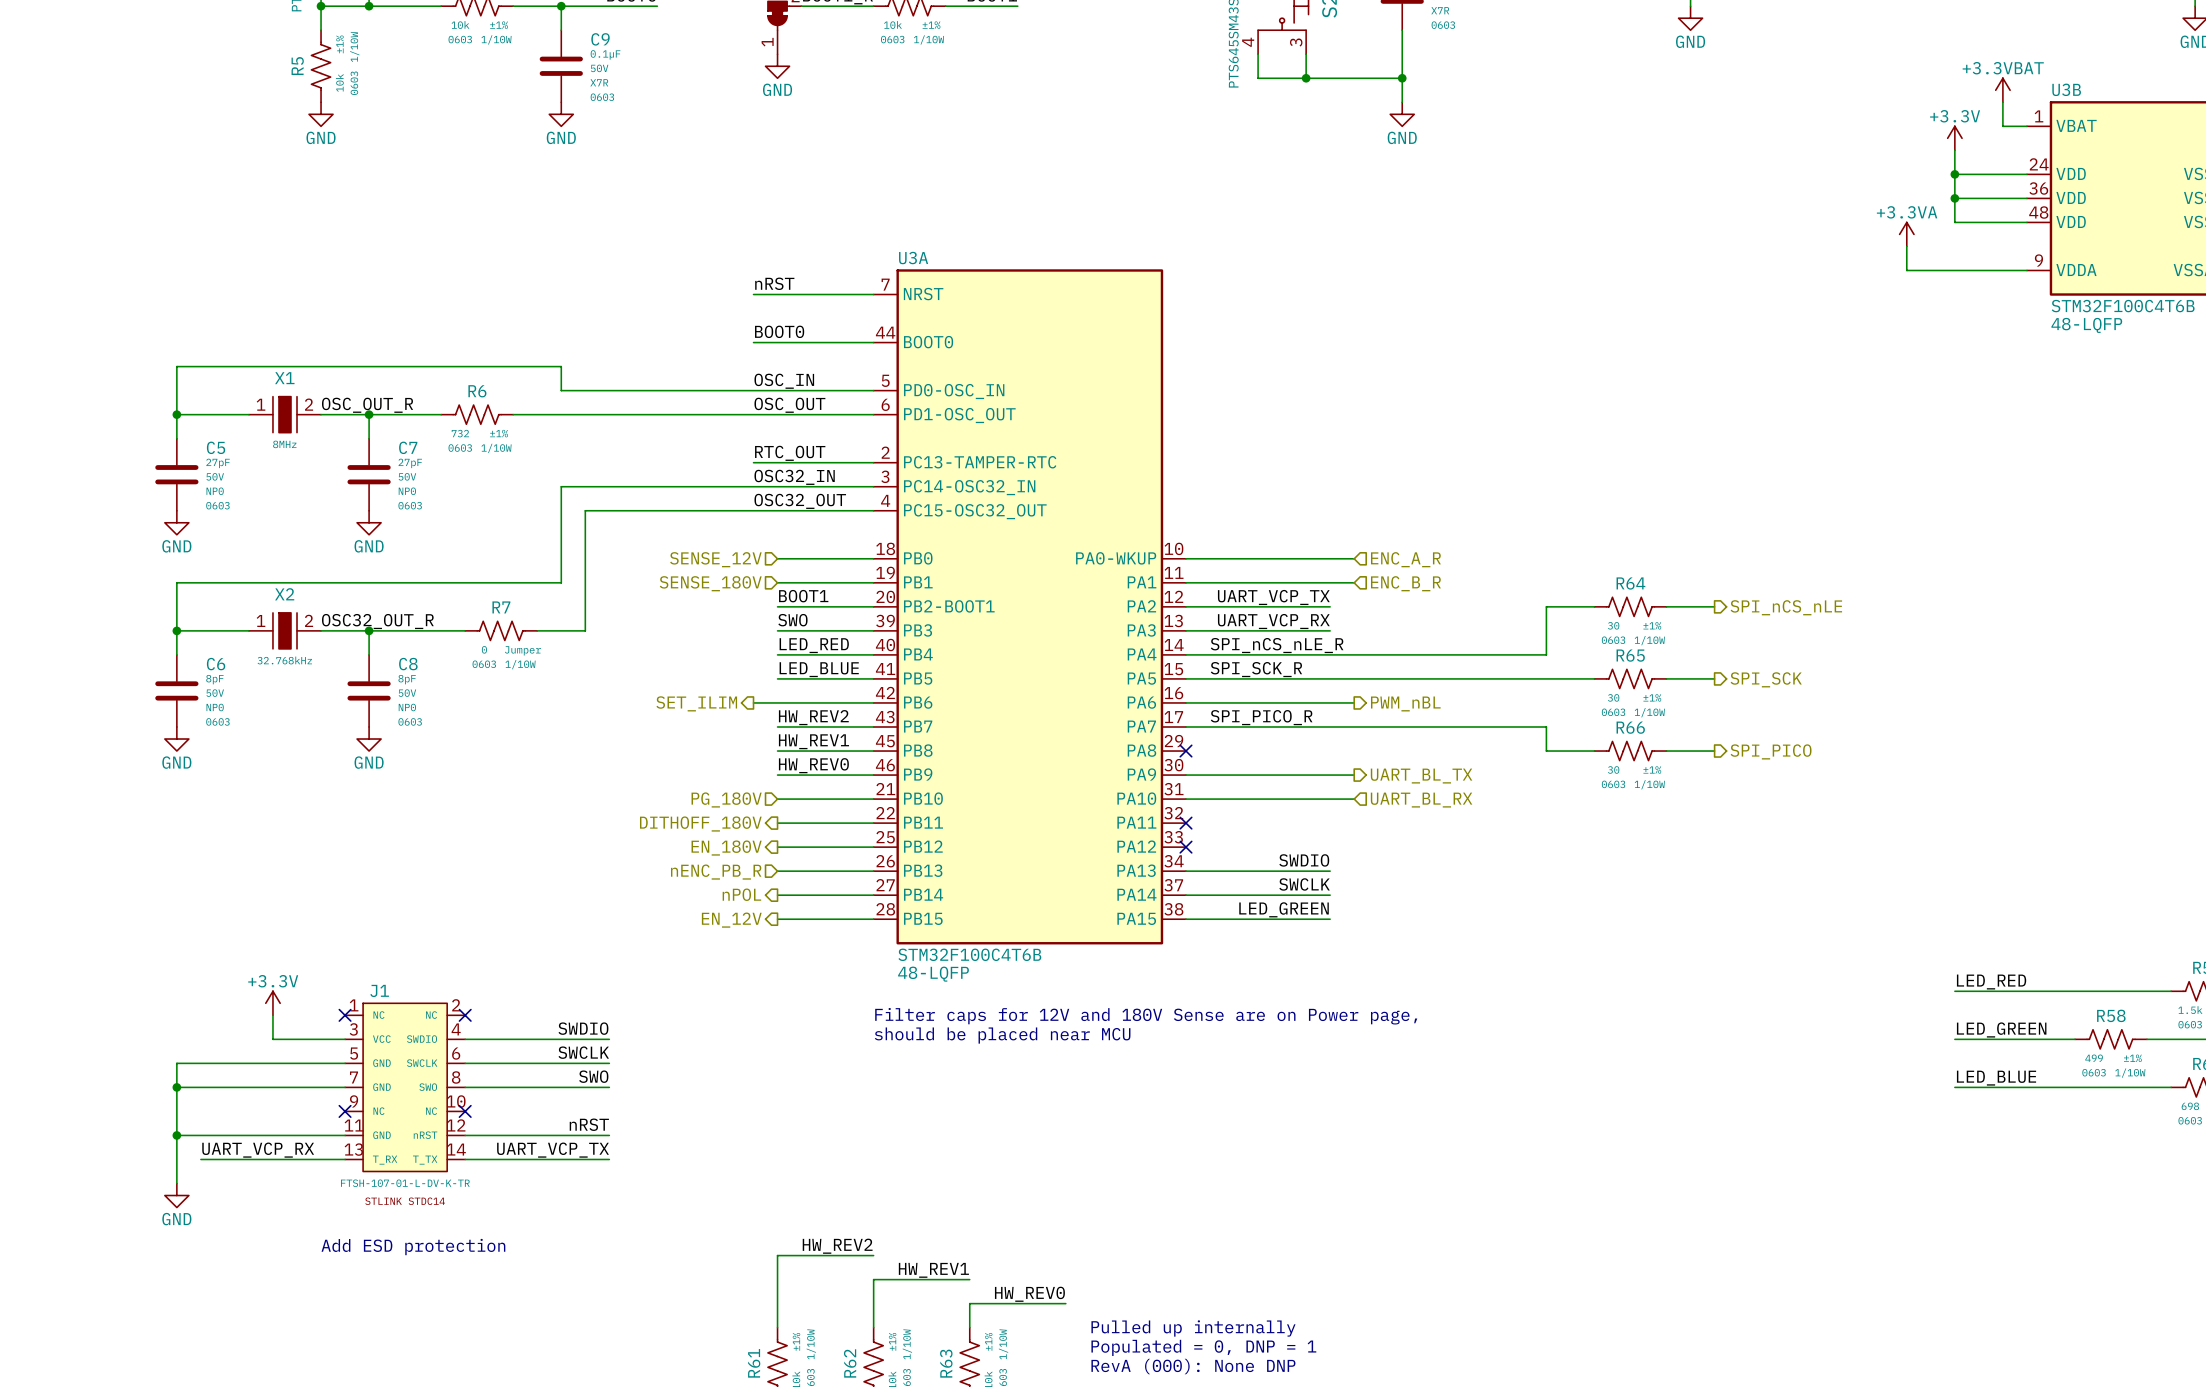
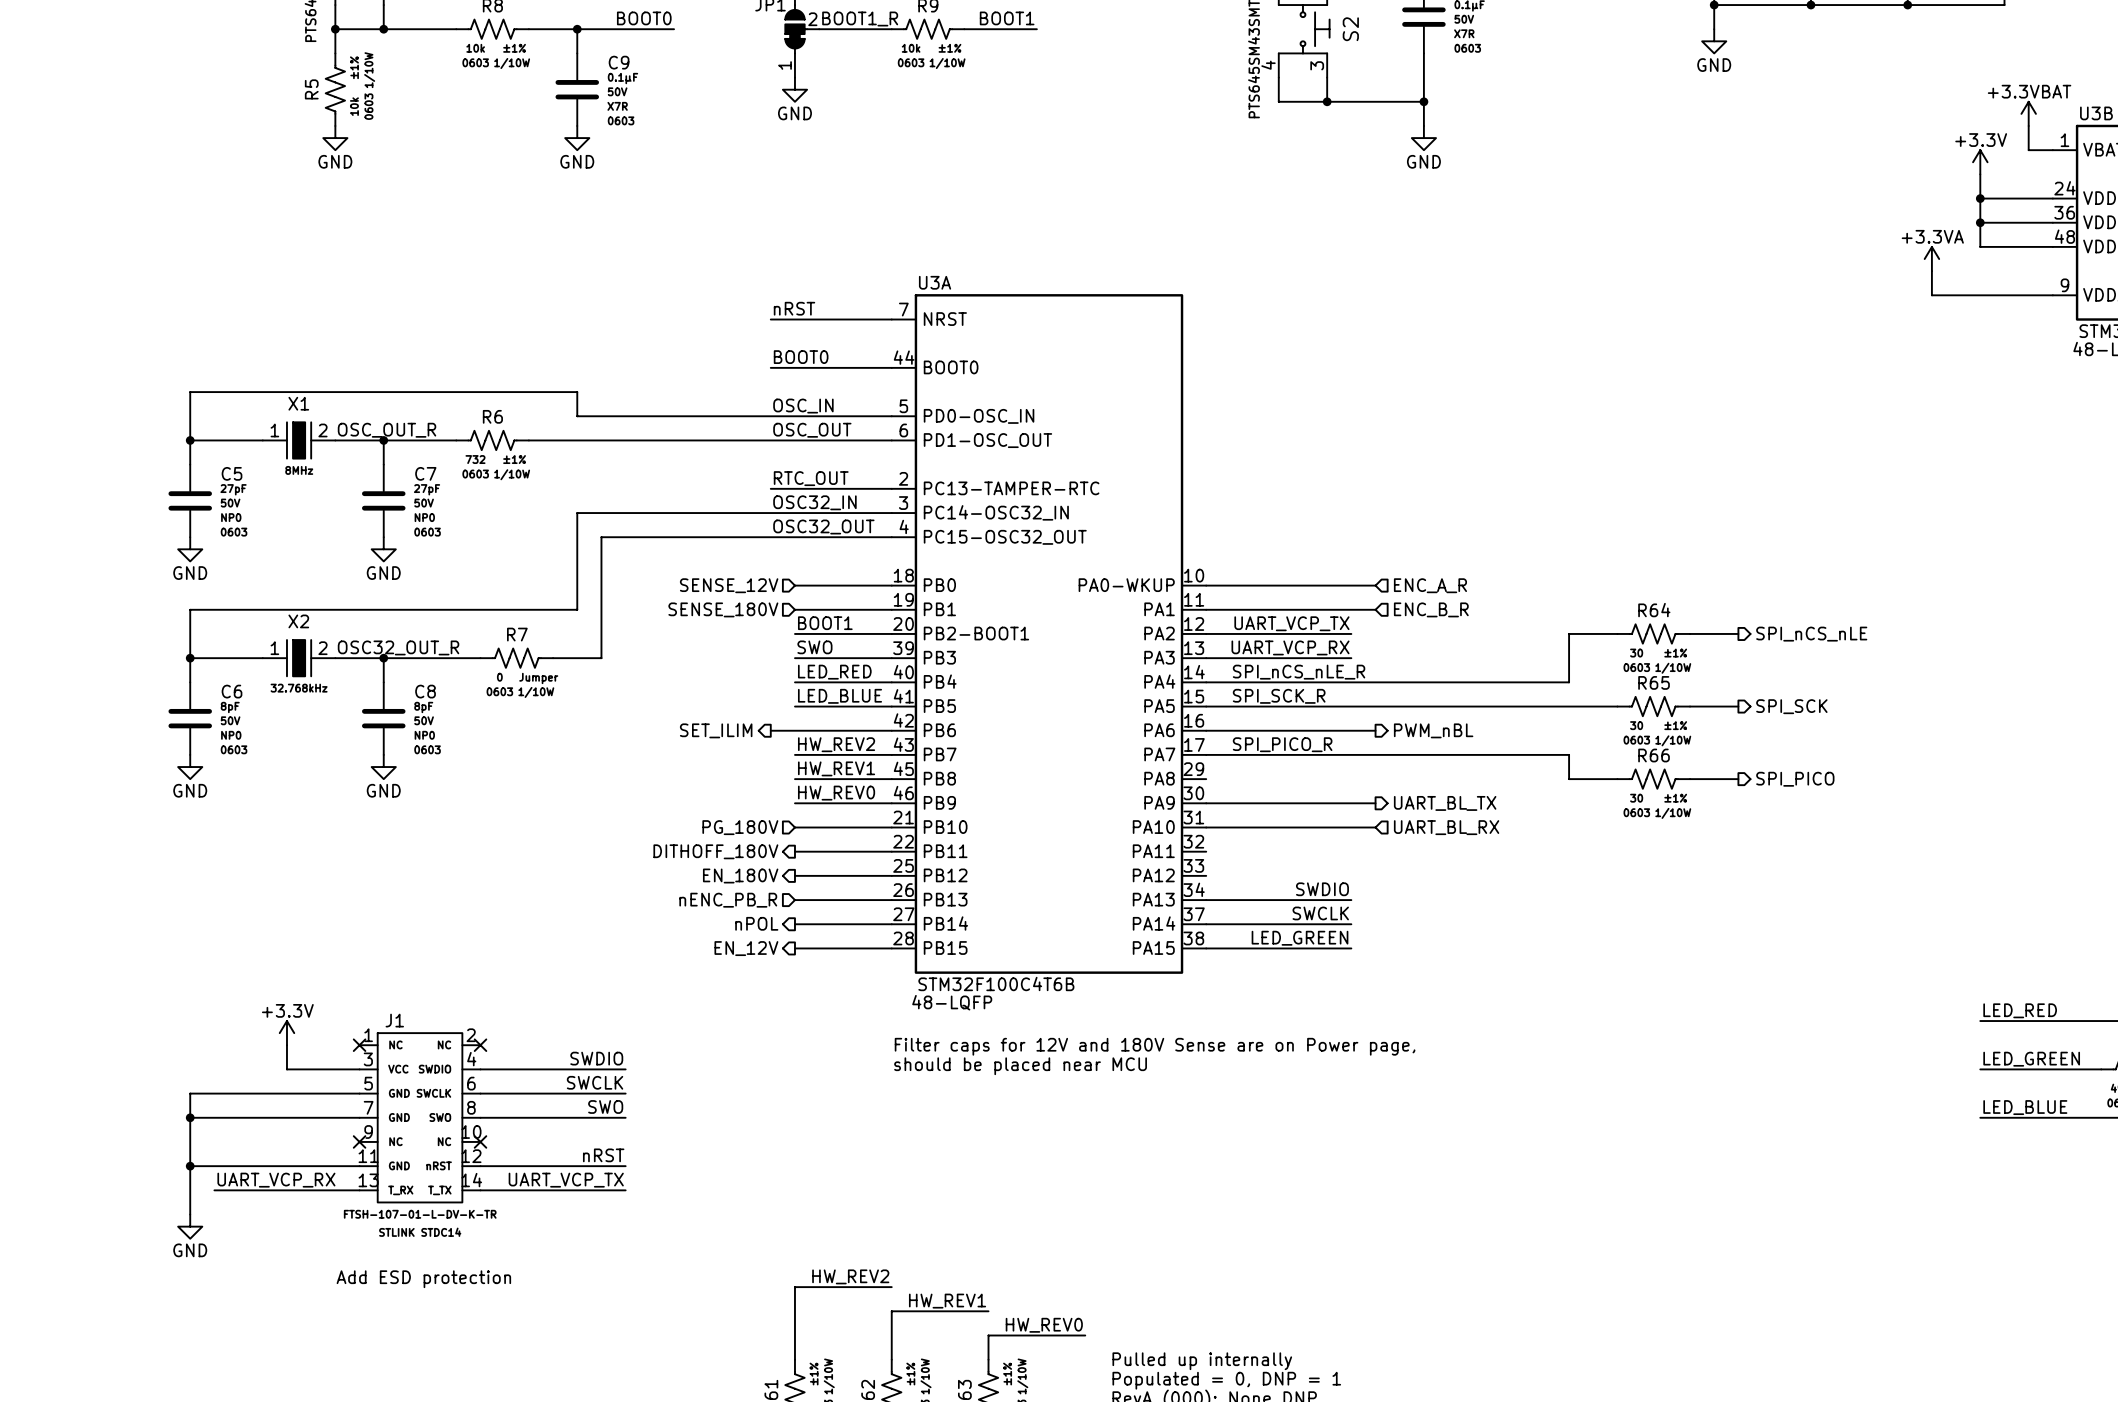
no-connect mark: (1185, 751) -> none
no-connect mark: (1185, 823) -> none
no-connect mark: (1185, 847) -> none

